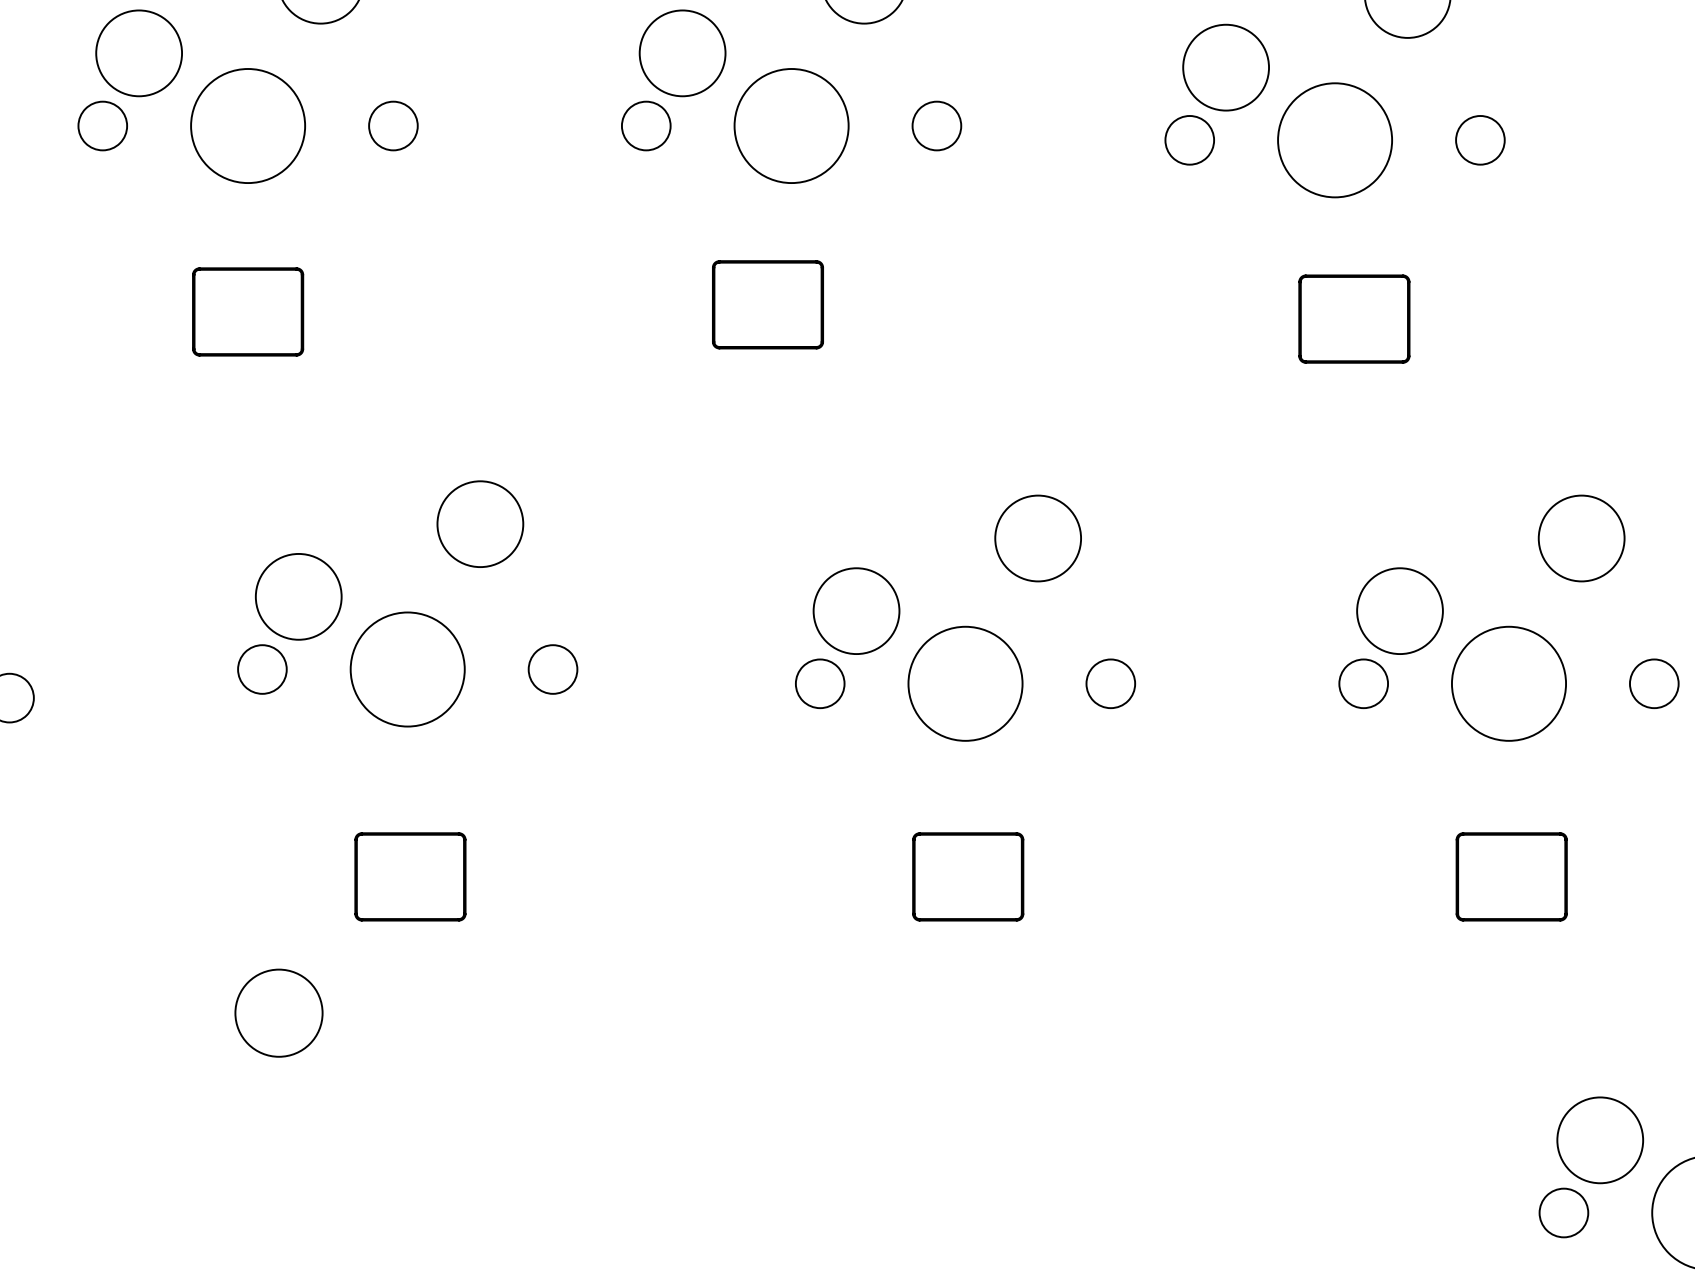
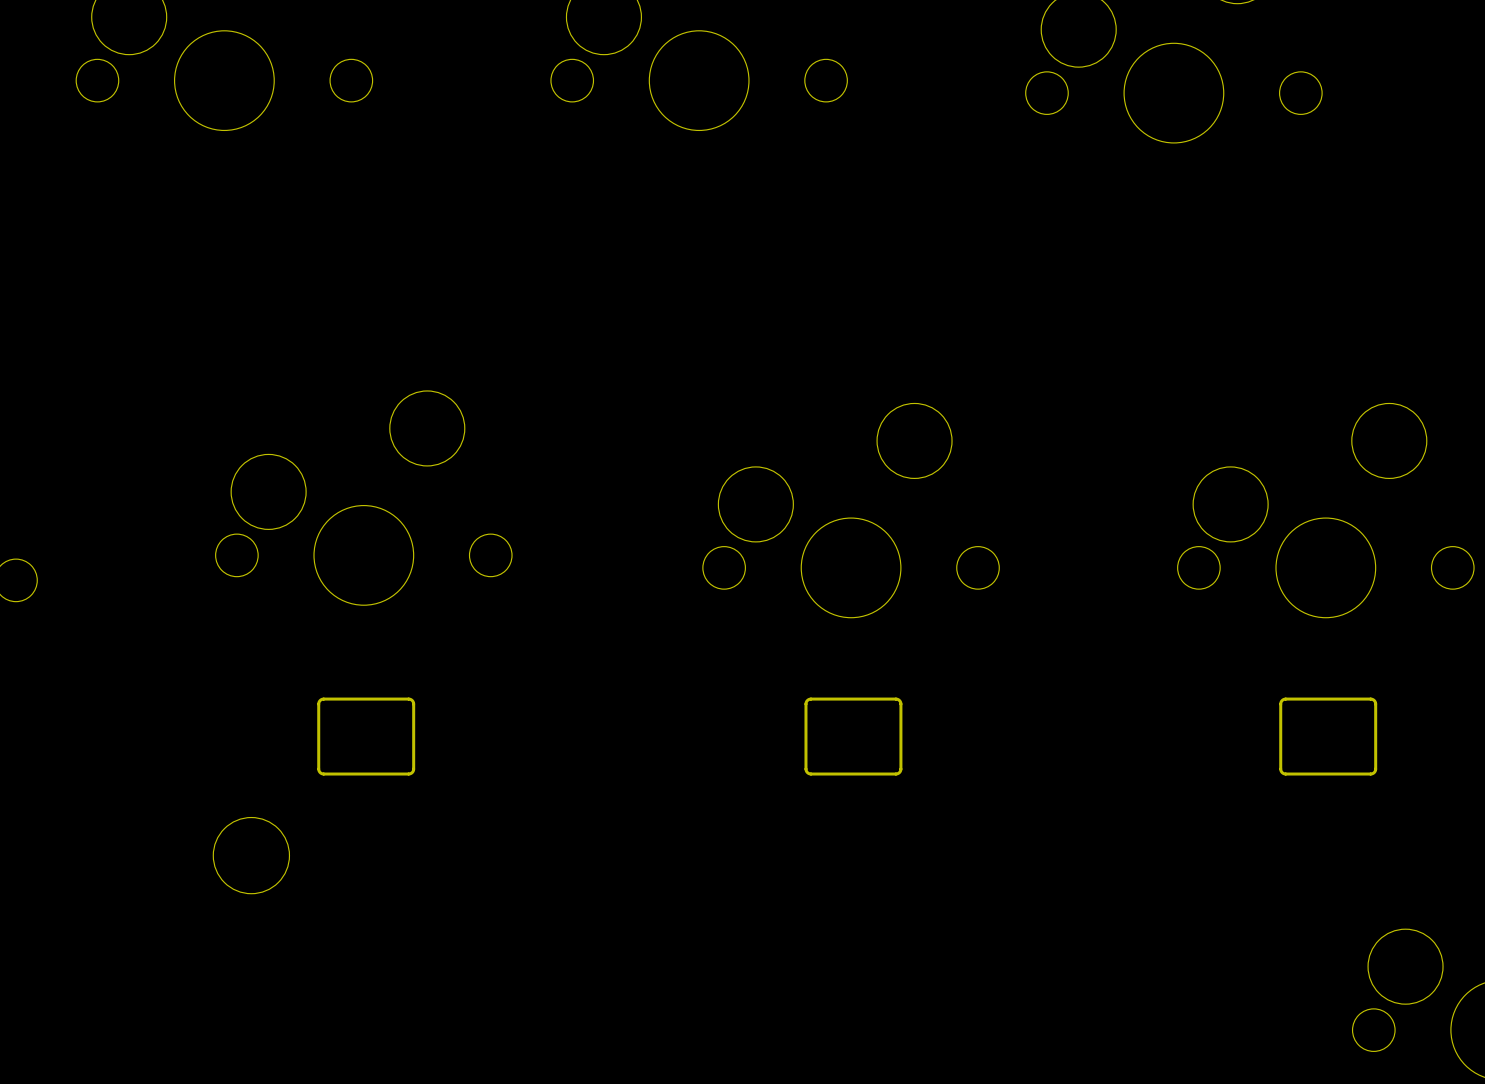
part: (768, 304) -> none
part: (248, 311) -> none
part: (1354, 319) -> none

